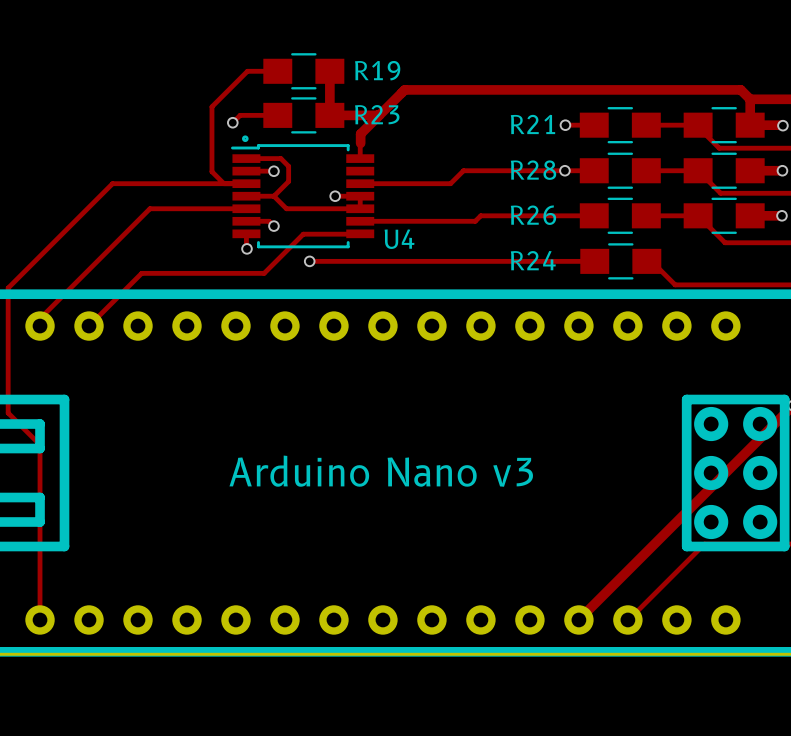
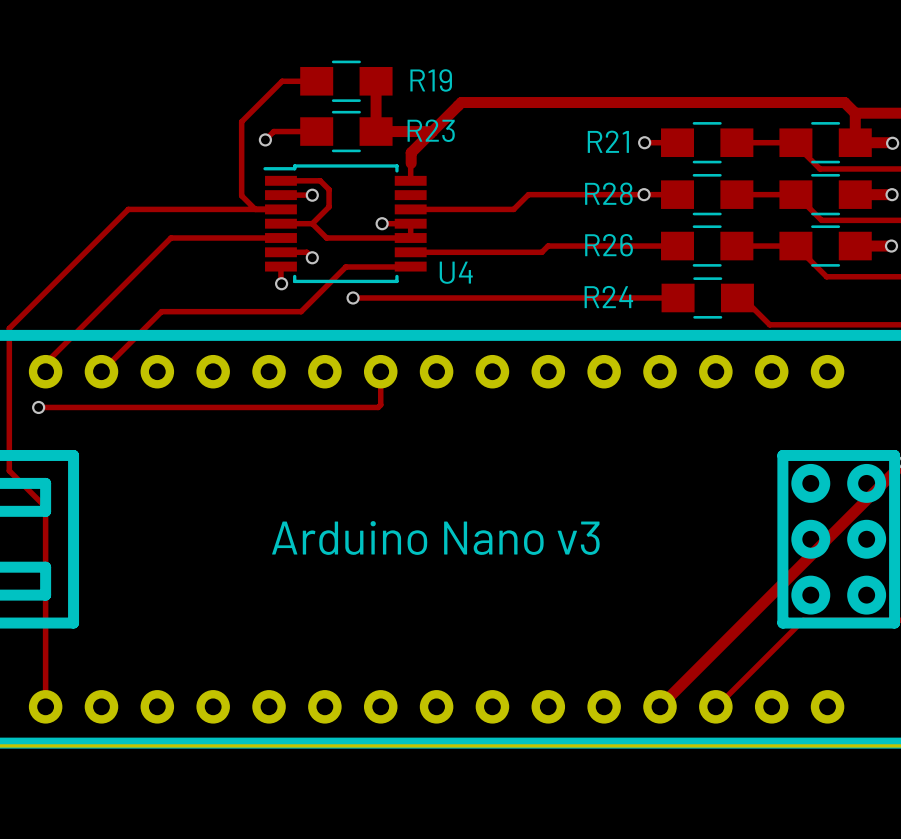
drawing: [242, 135, 249, 143] -> none
track: none -> (380, 371) (380, 404) (378, 407) (38, 407)
via: none -> (38, 407)

